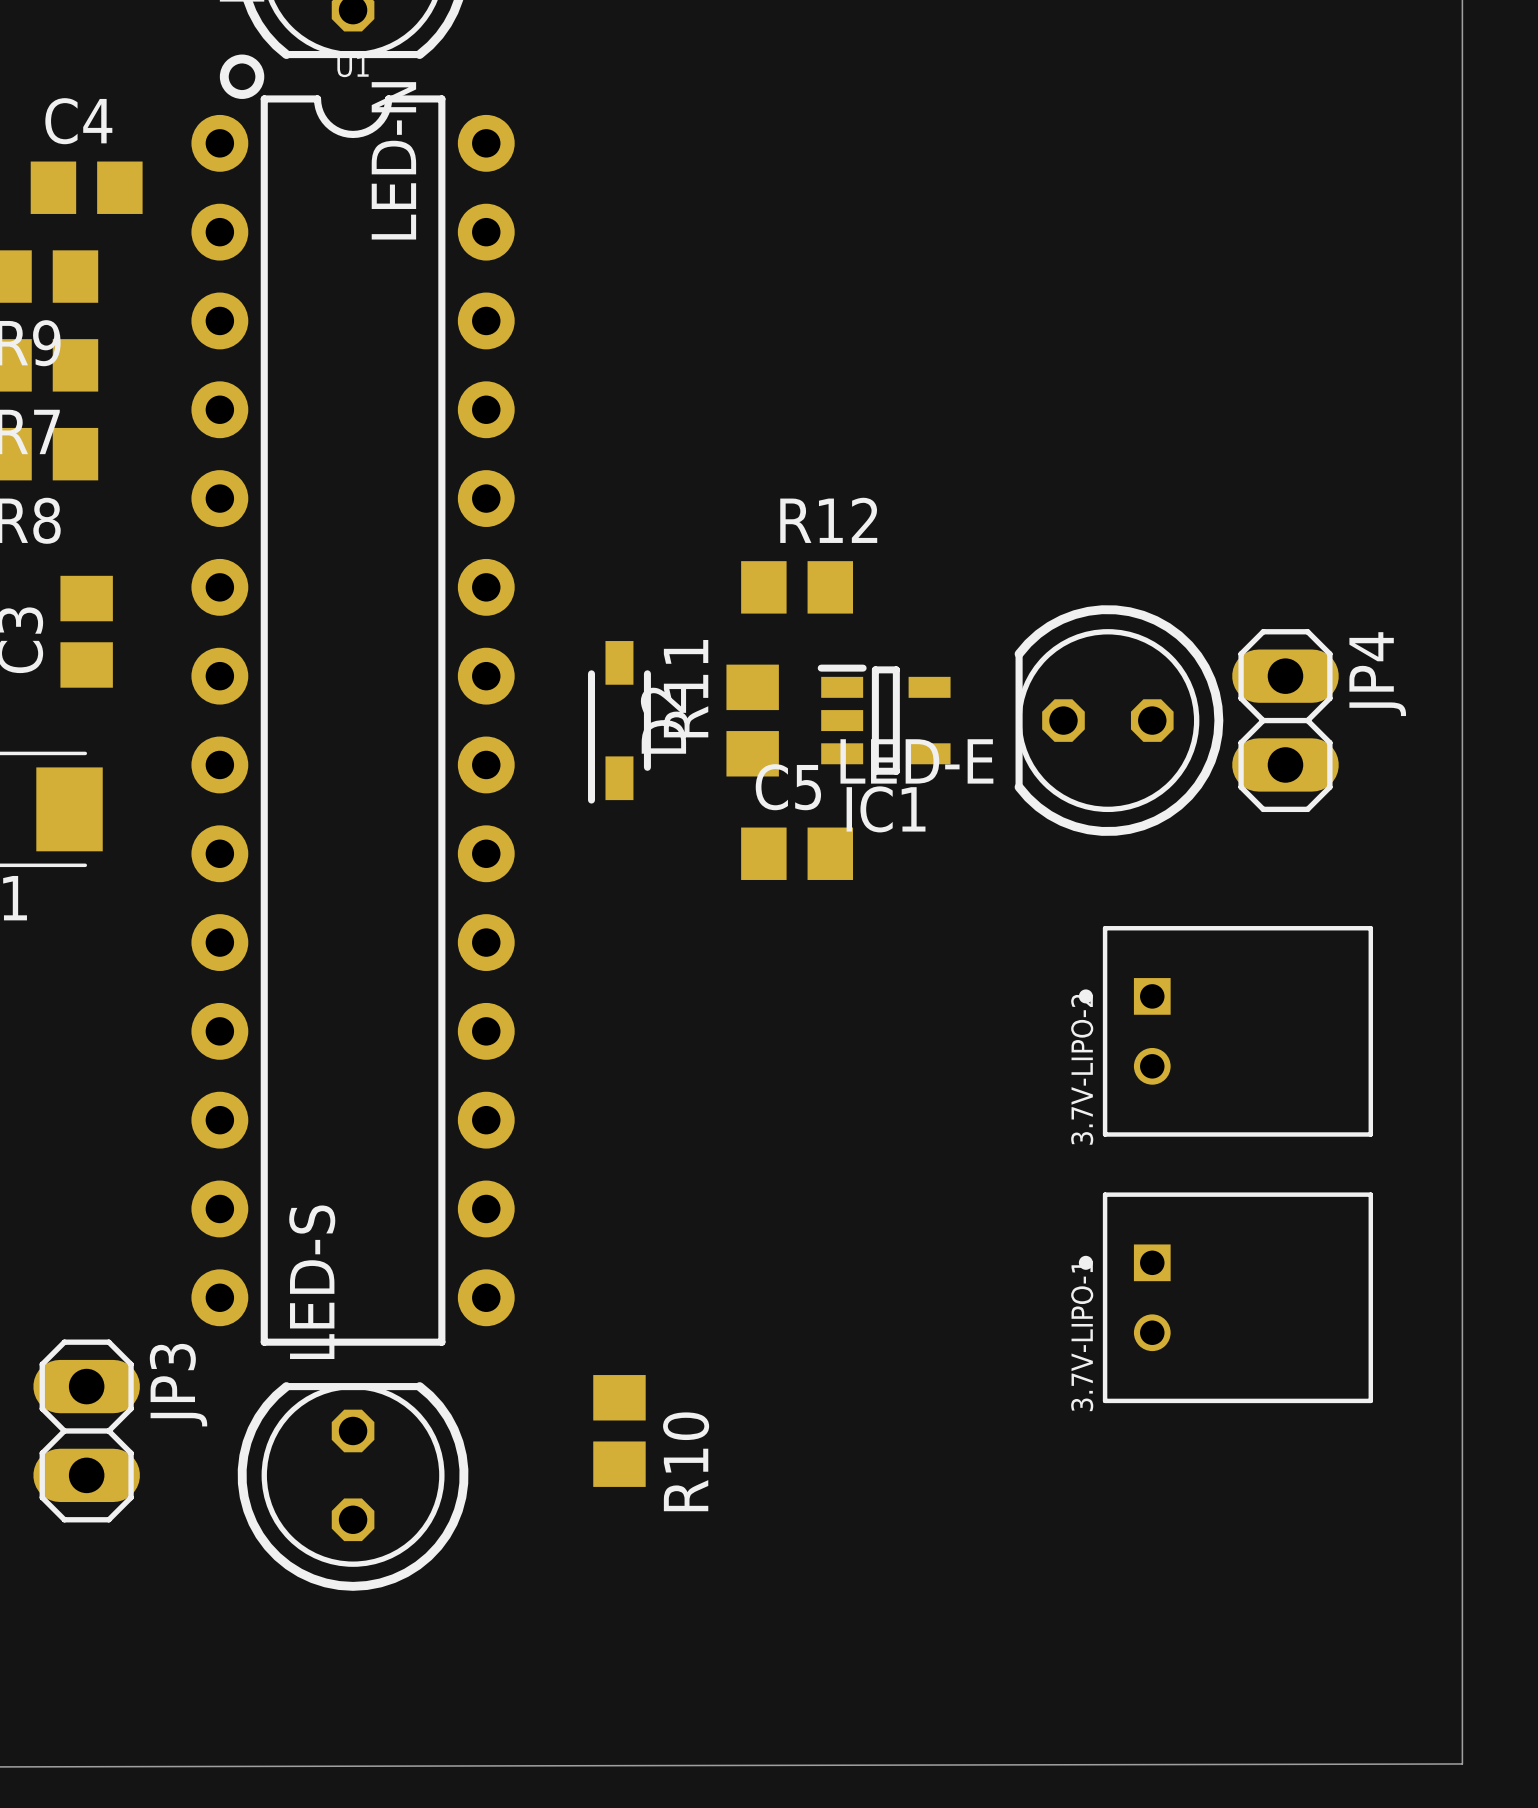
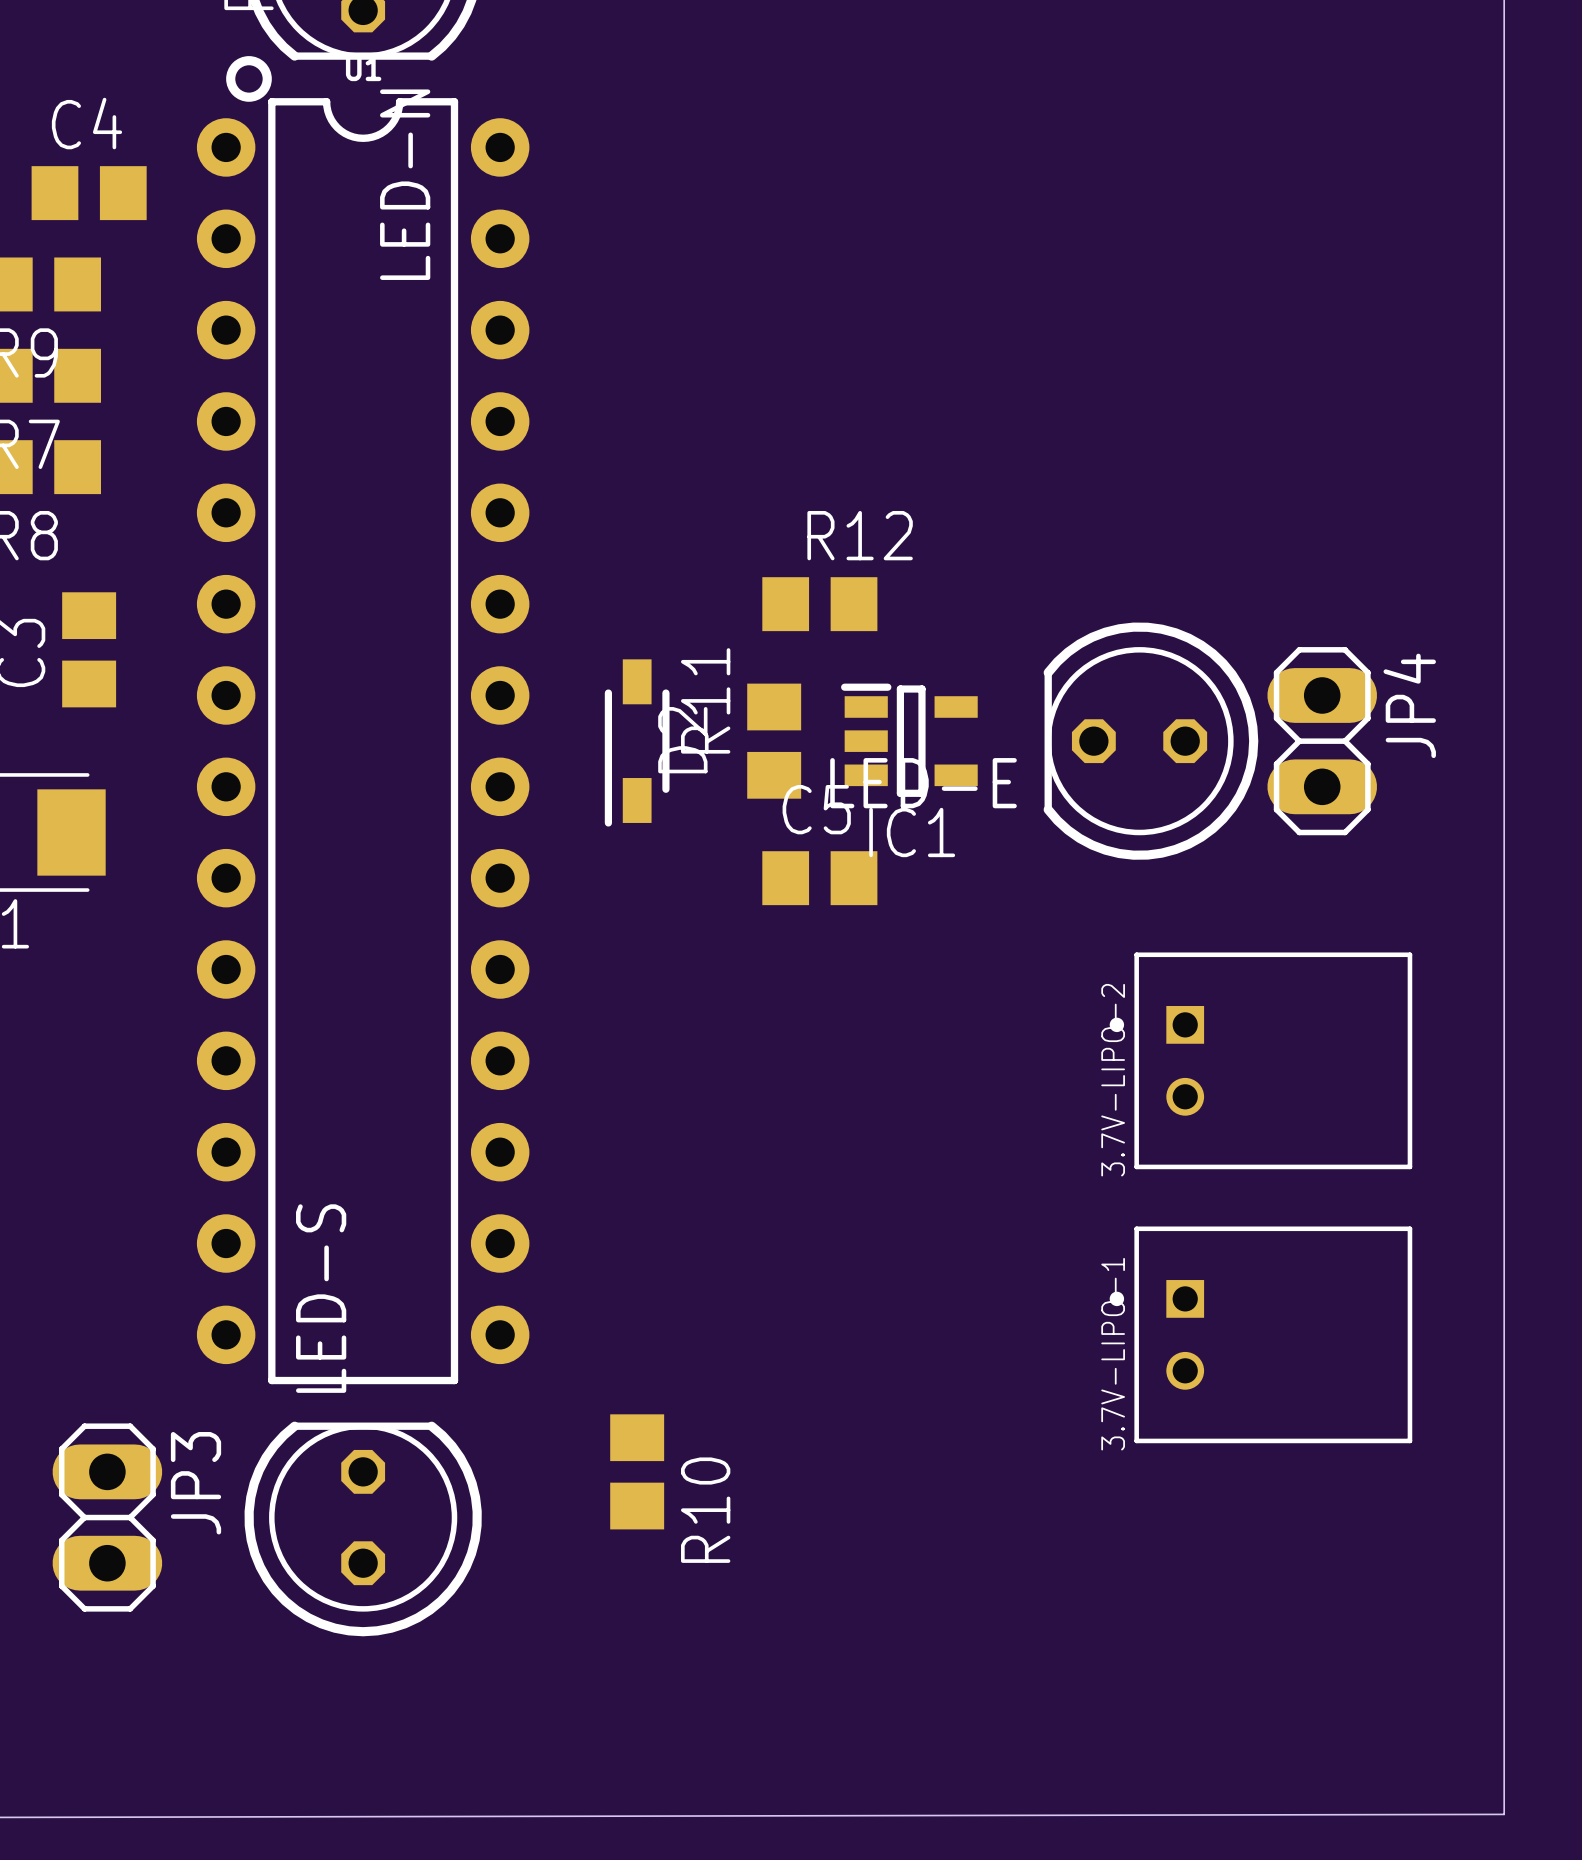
JP3 position: (86, 1430) -> (107, 1517)

